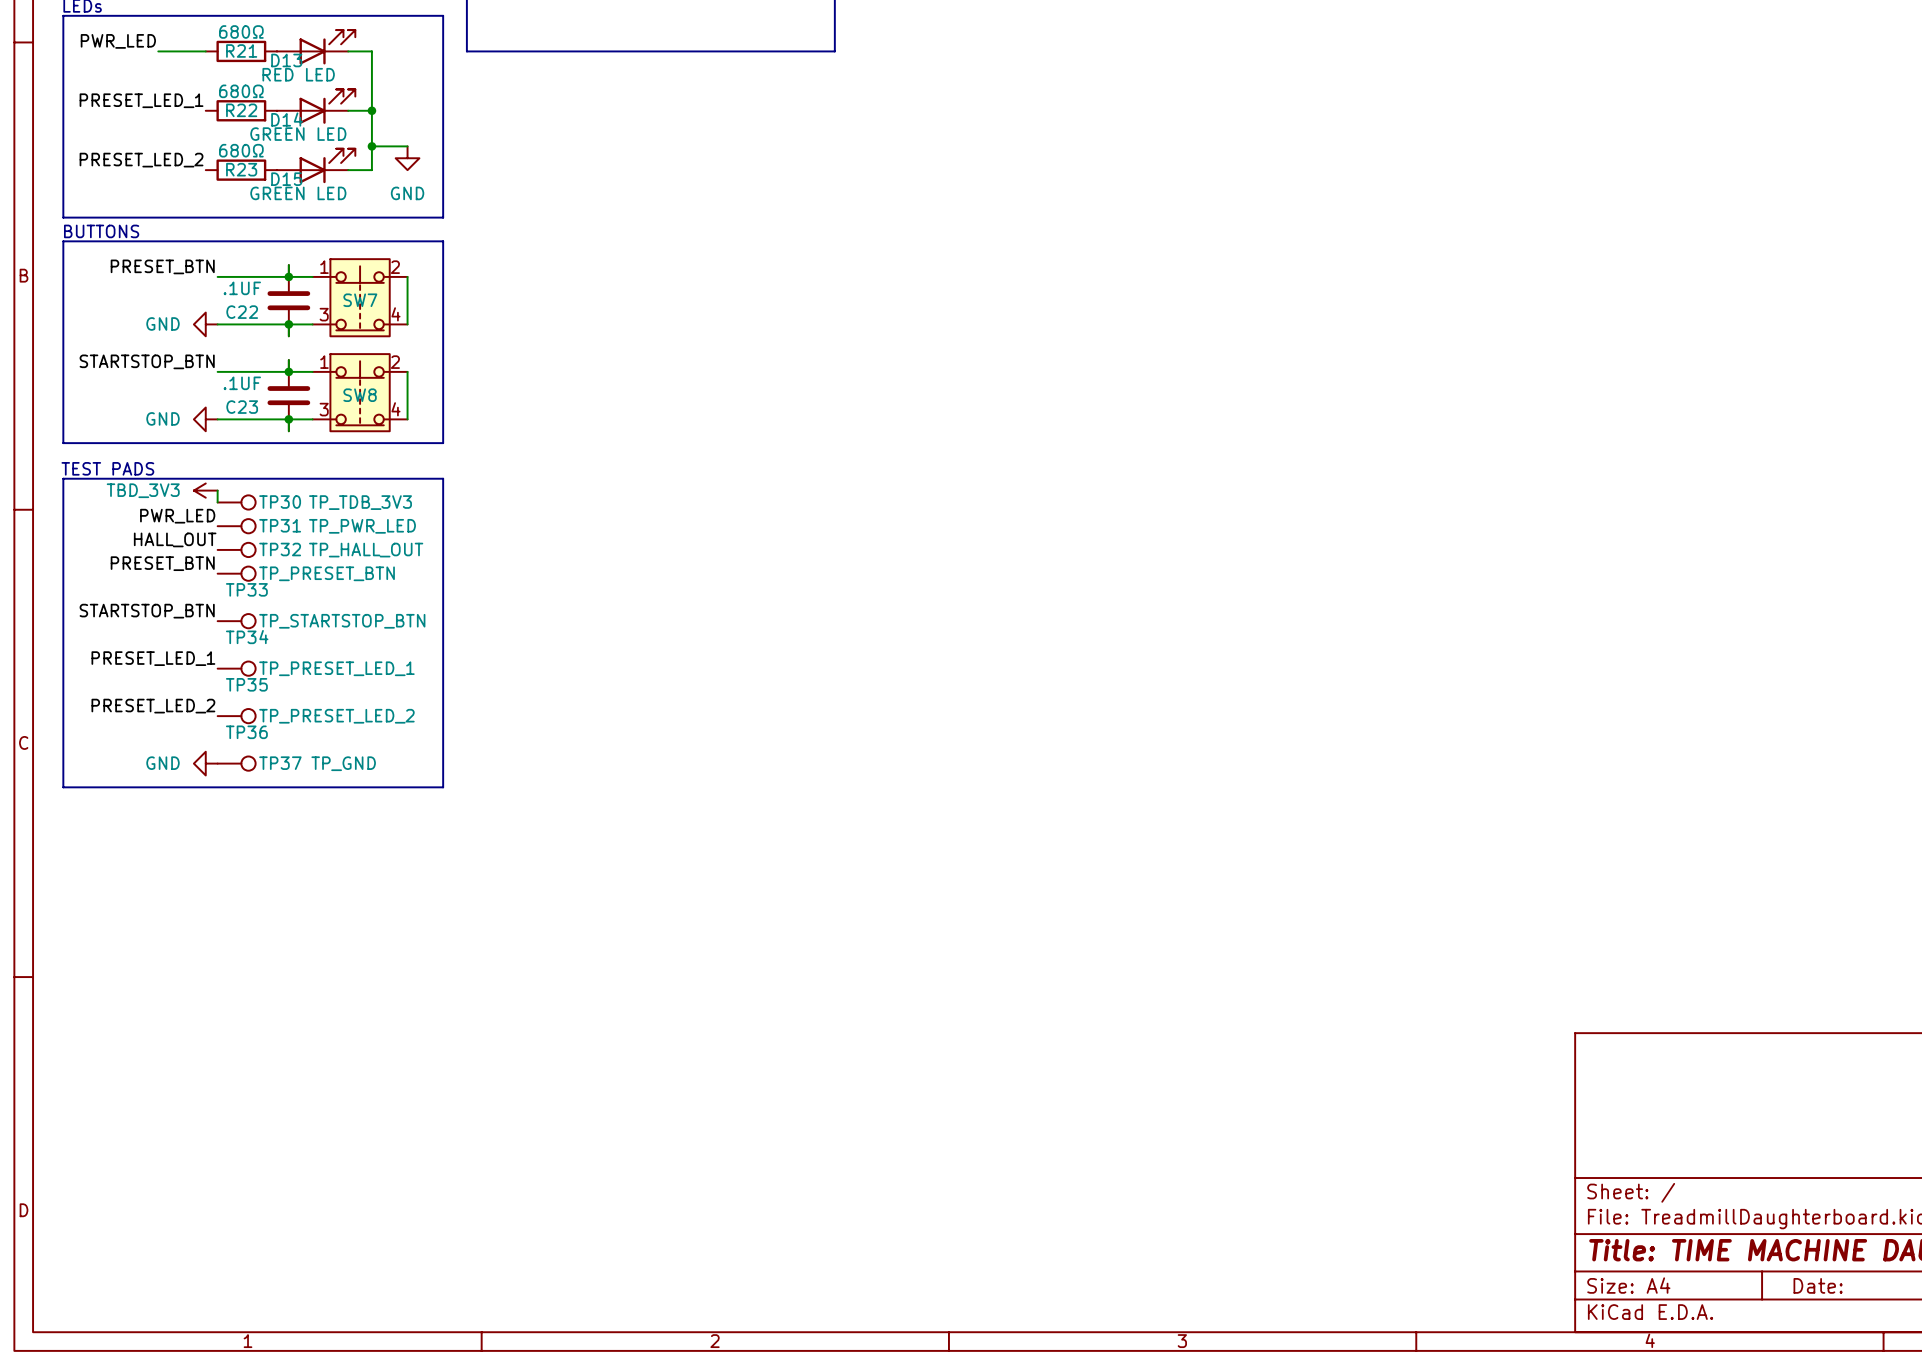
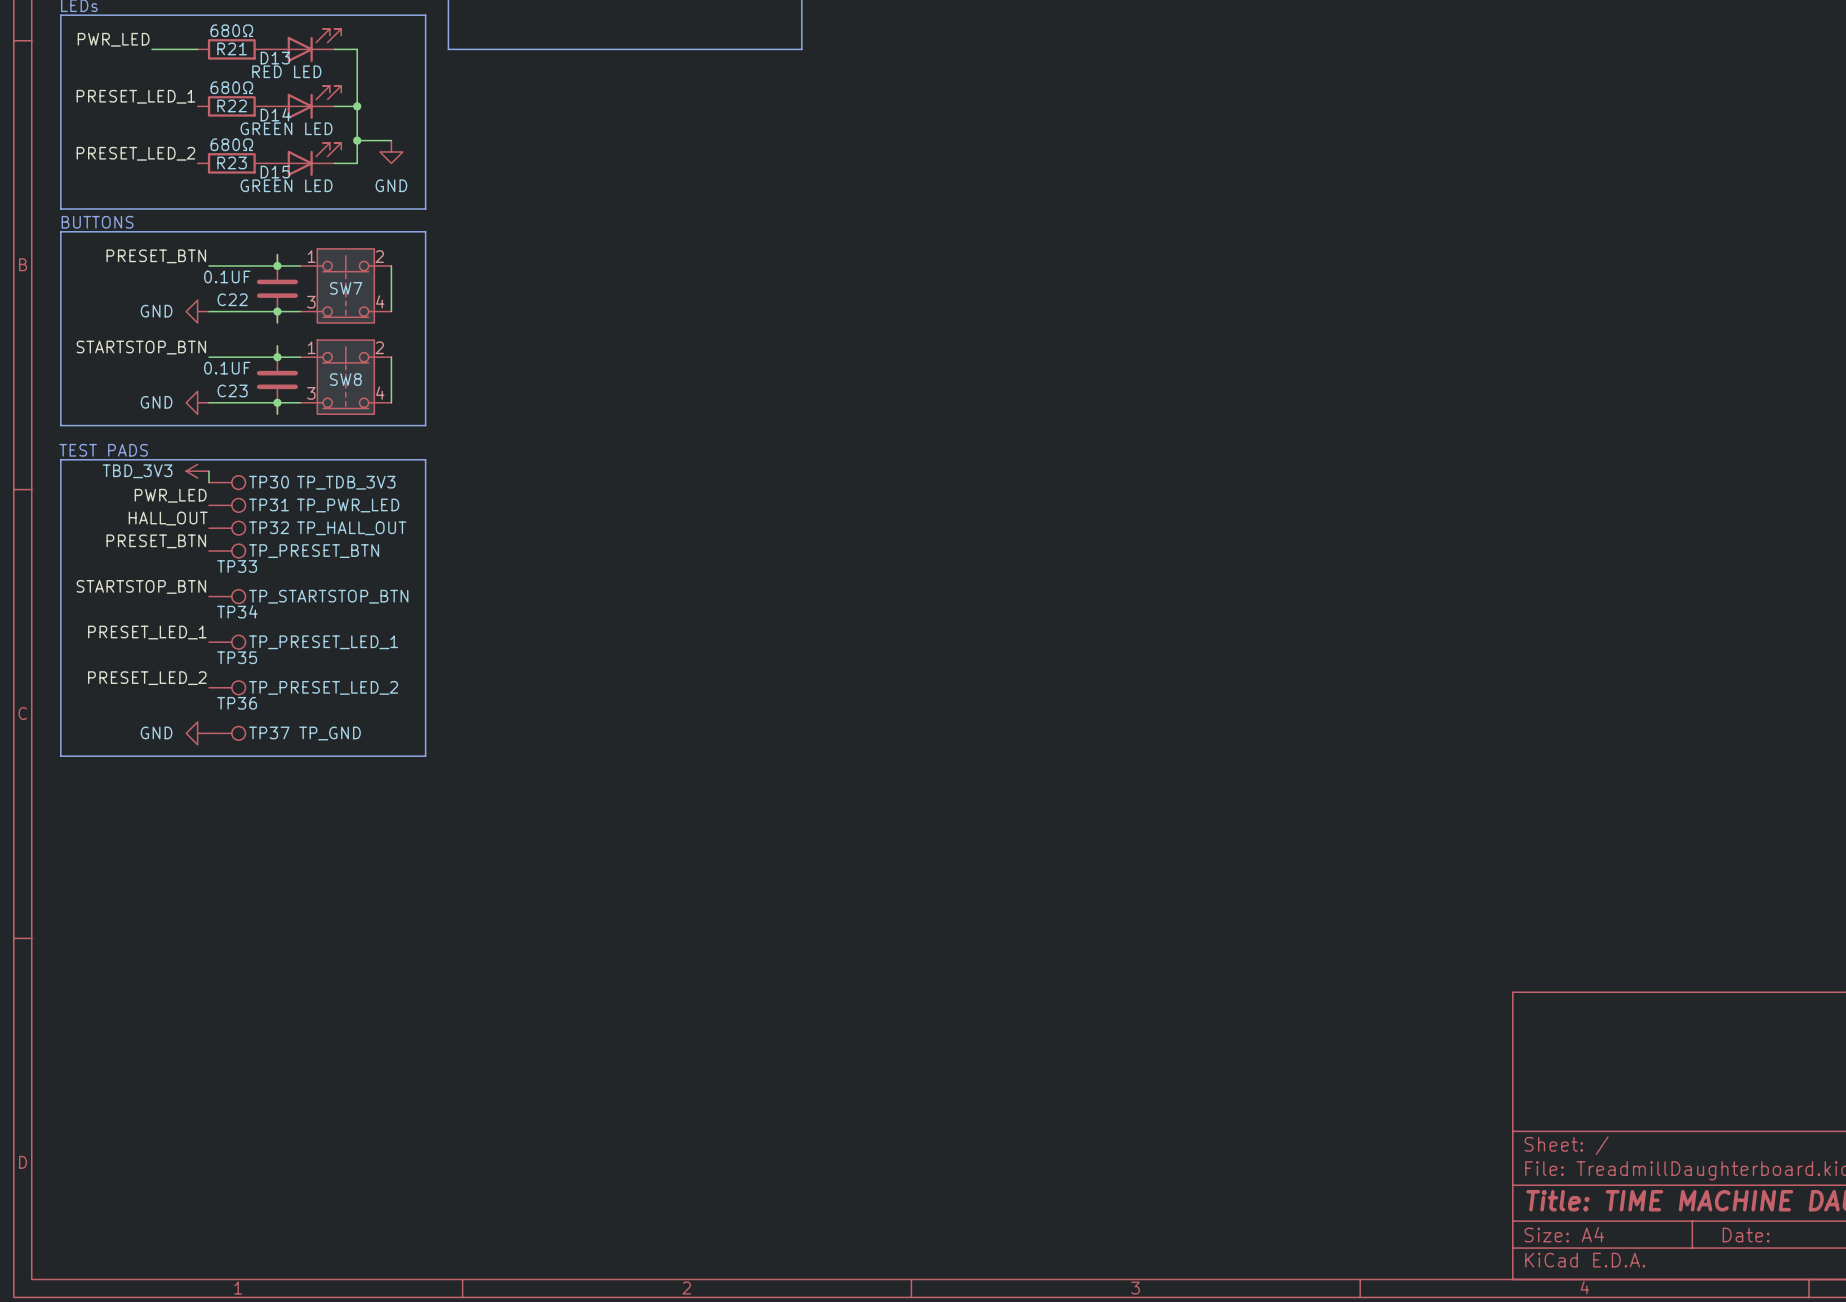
C22 value: .1UF (242, 288) -> 0.1UF (227, 276)
C23 value: .1UF (242, 383) -> 0.1UF (227, 368)

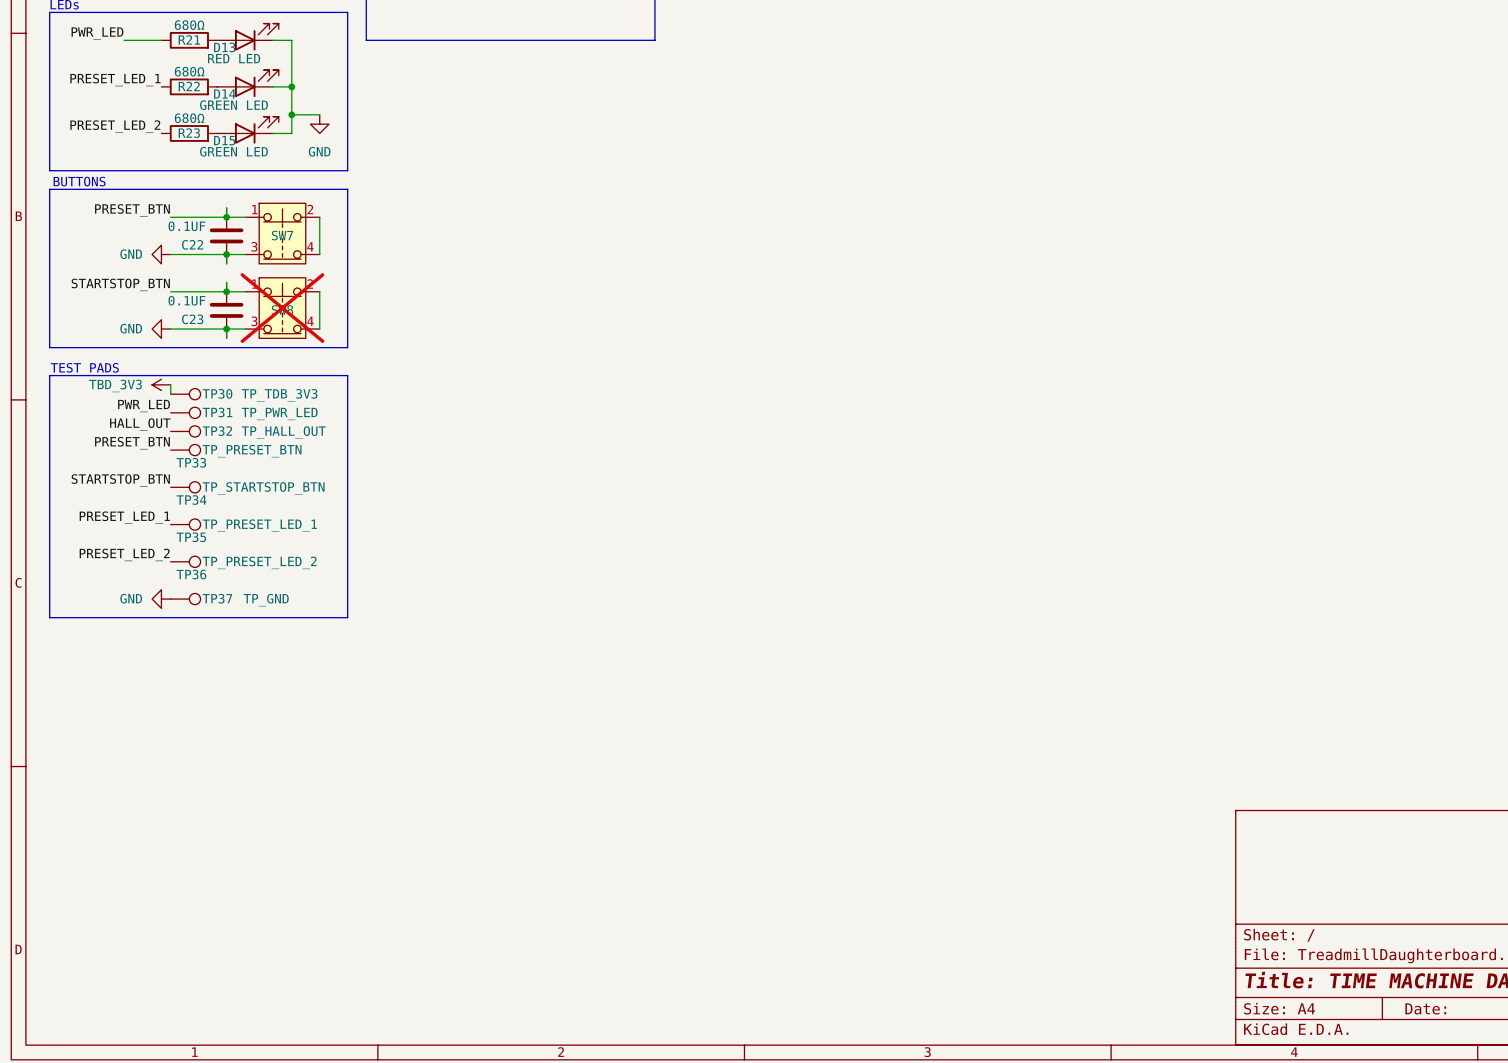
SW8 do-not-place cross: none -> (282, 308)

